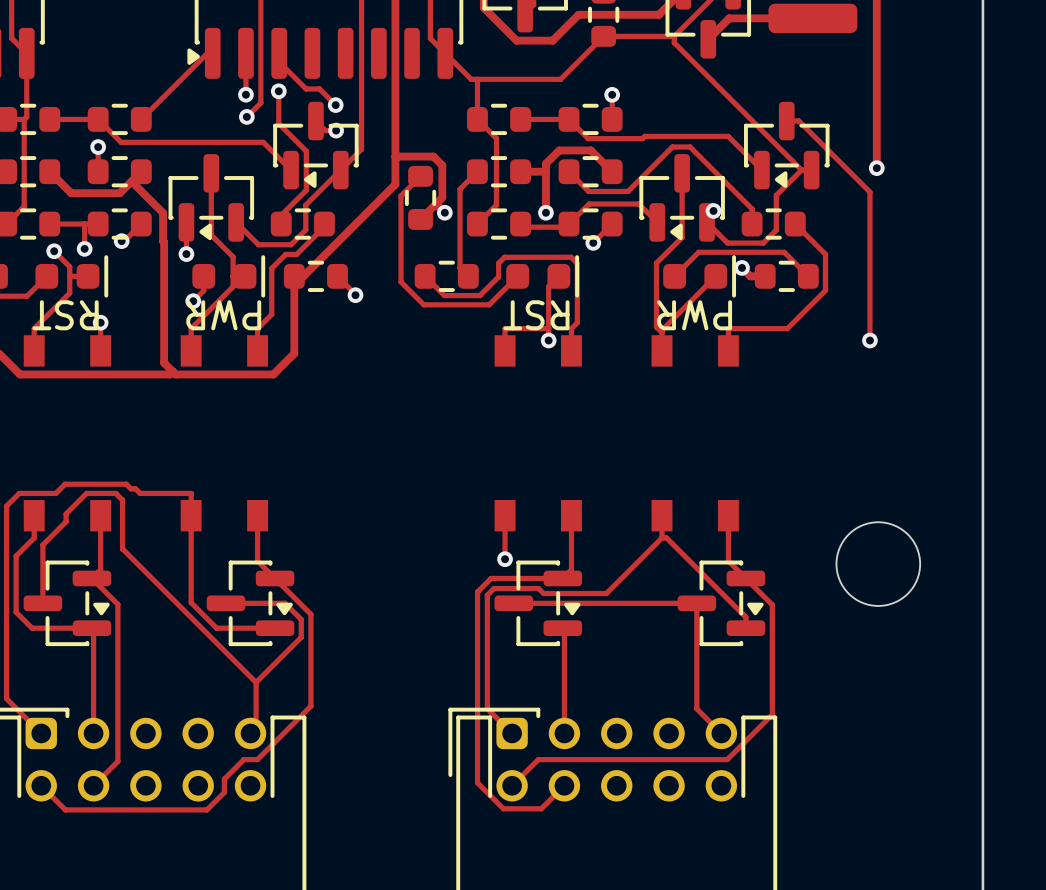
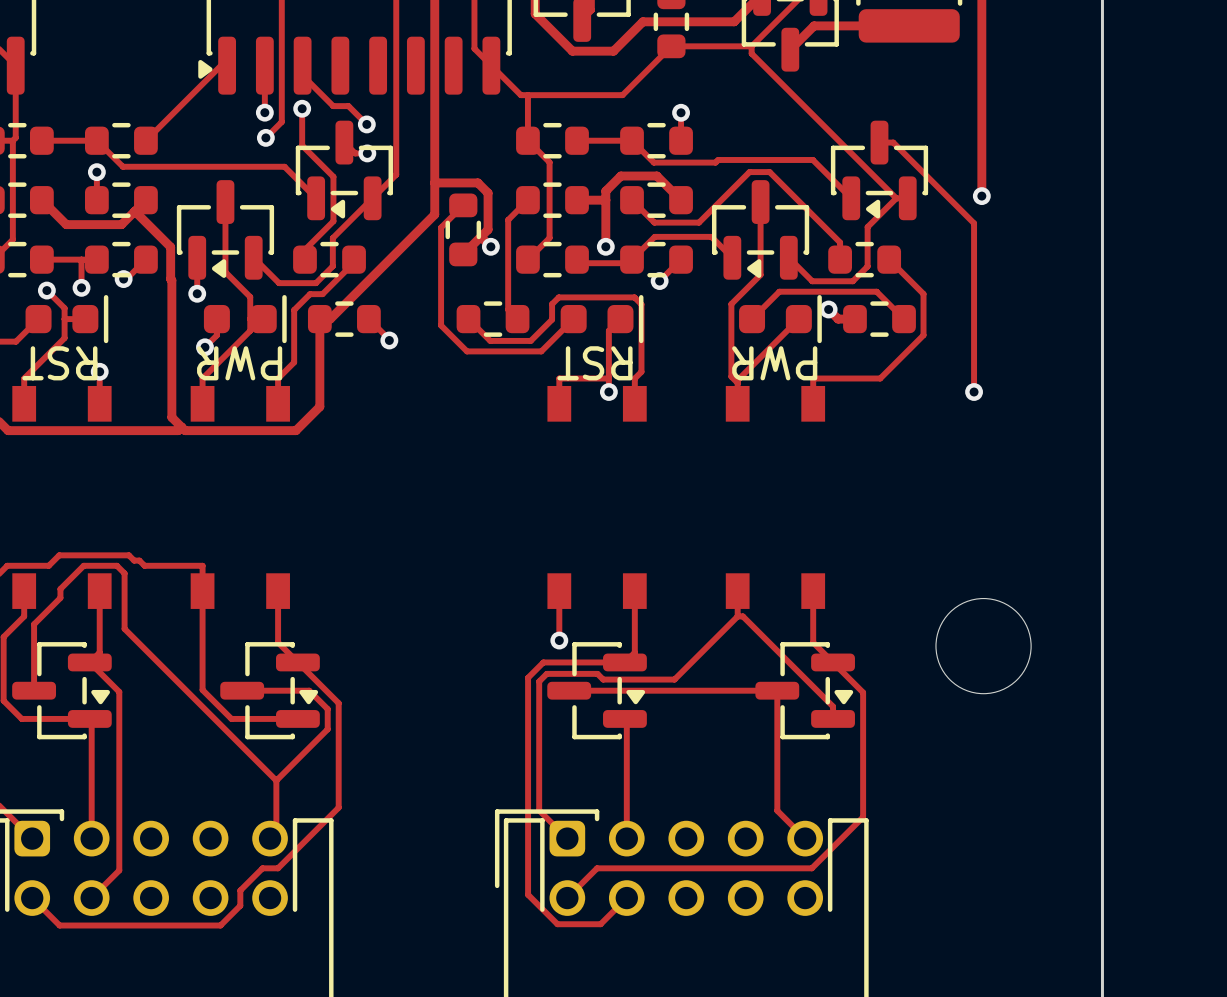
via: (713, 210) -> none

